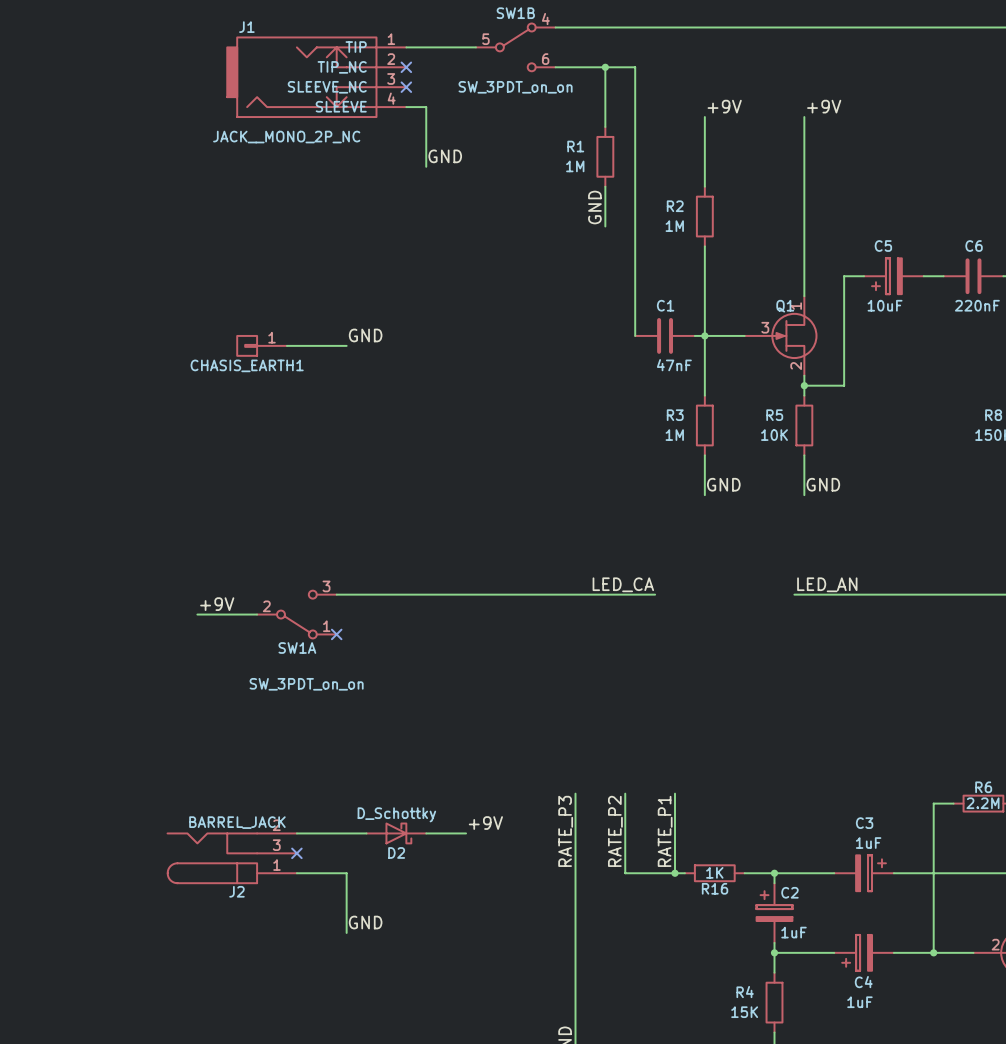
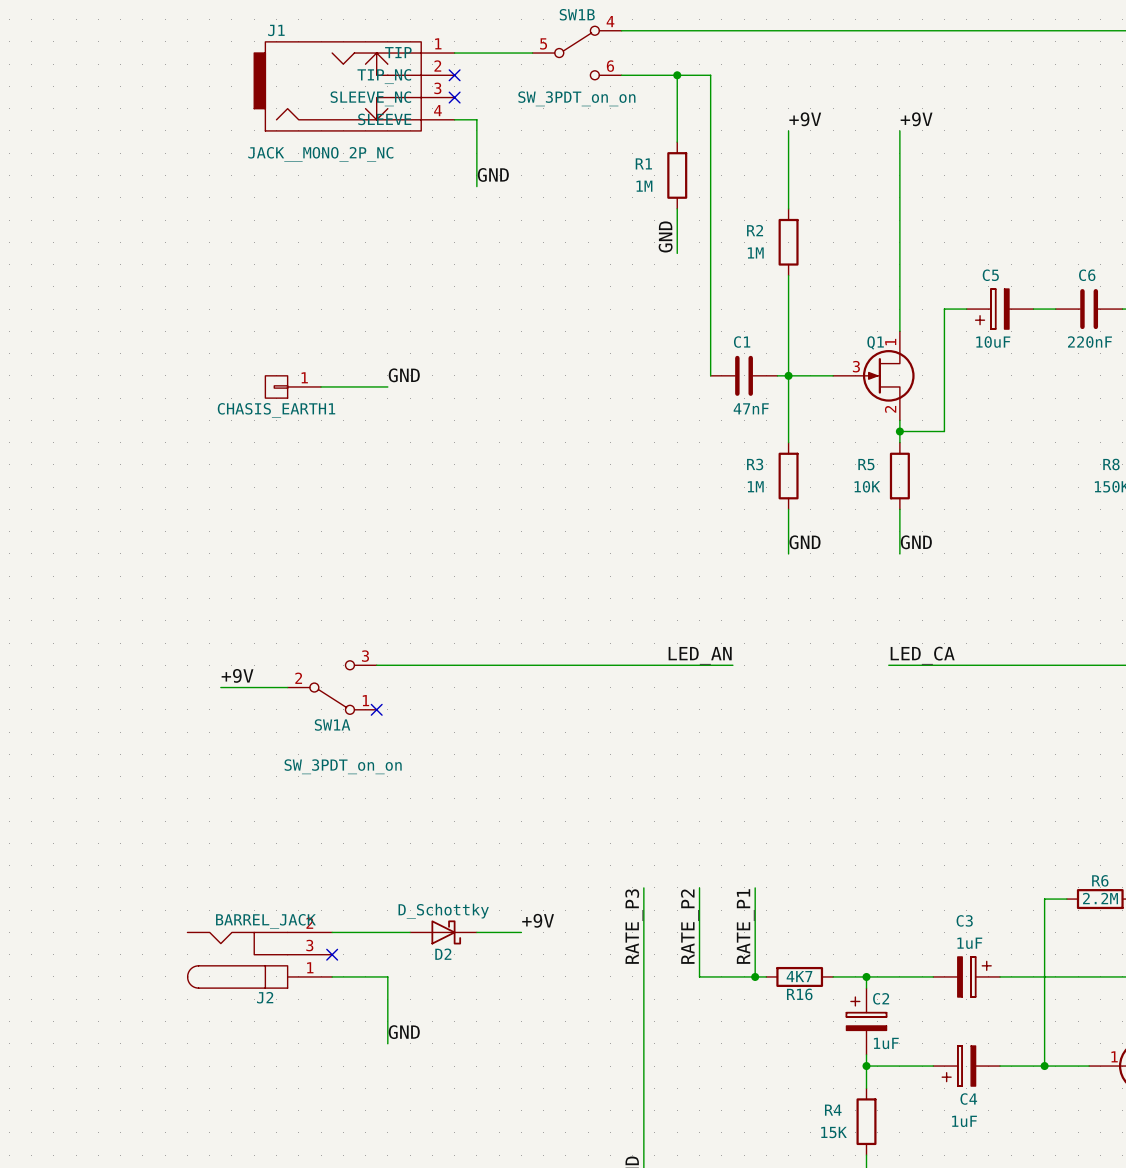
label: LED_CA (623, 584) -> LED_AN (700, 655)
label: LED_AN (827, 584) -> LED_CA (922, 655)
R16 value: 1K (714, 872) -> 4K7 (799, 976)
part pin number: 2 (995, 944) -> 1 (1114, 1056)

